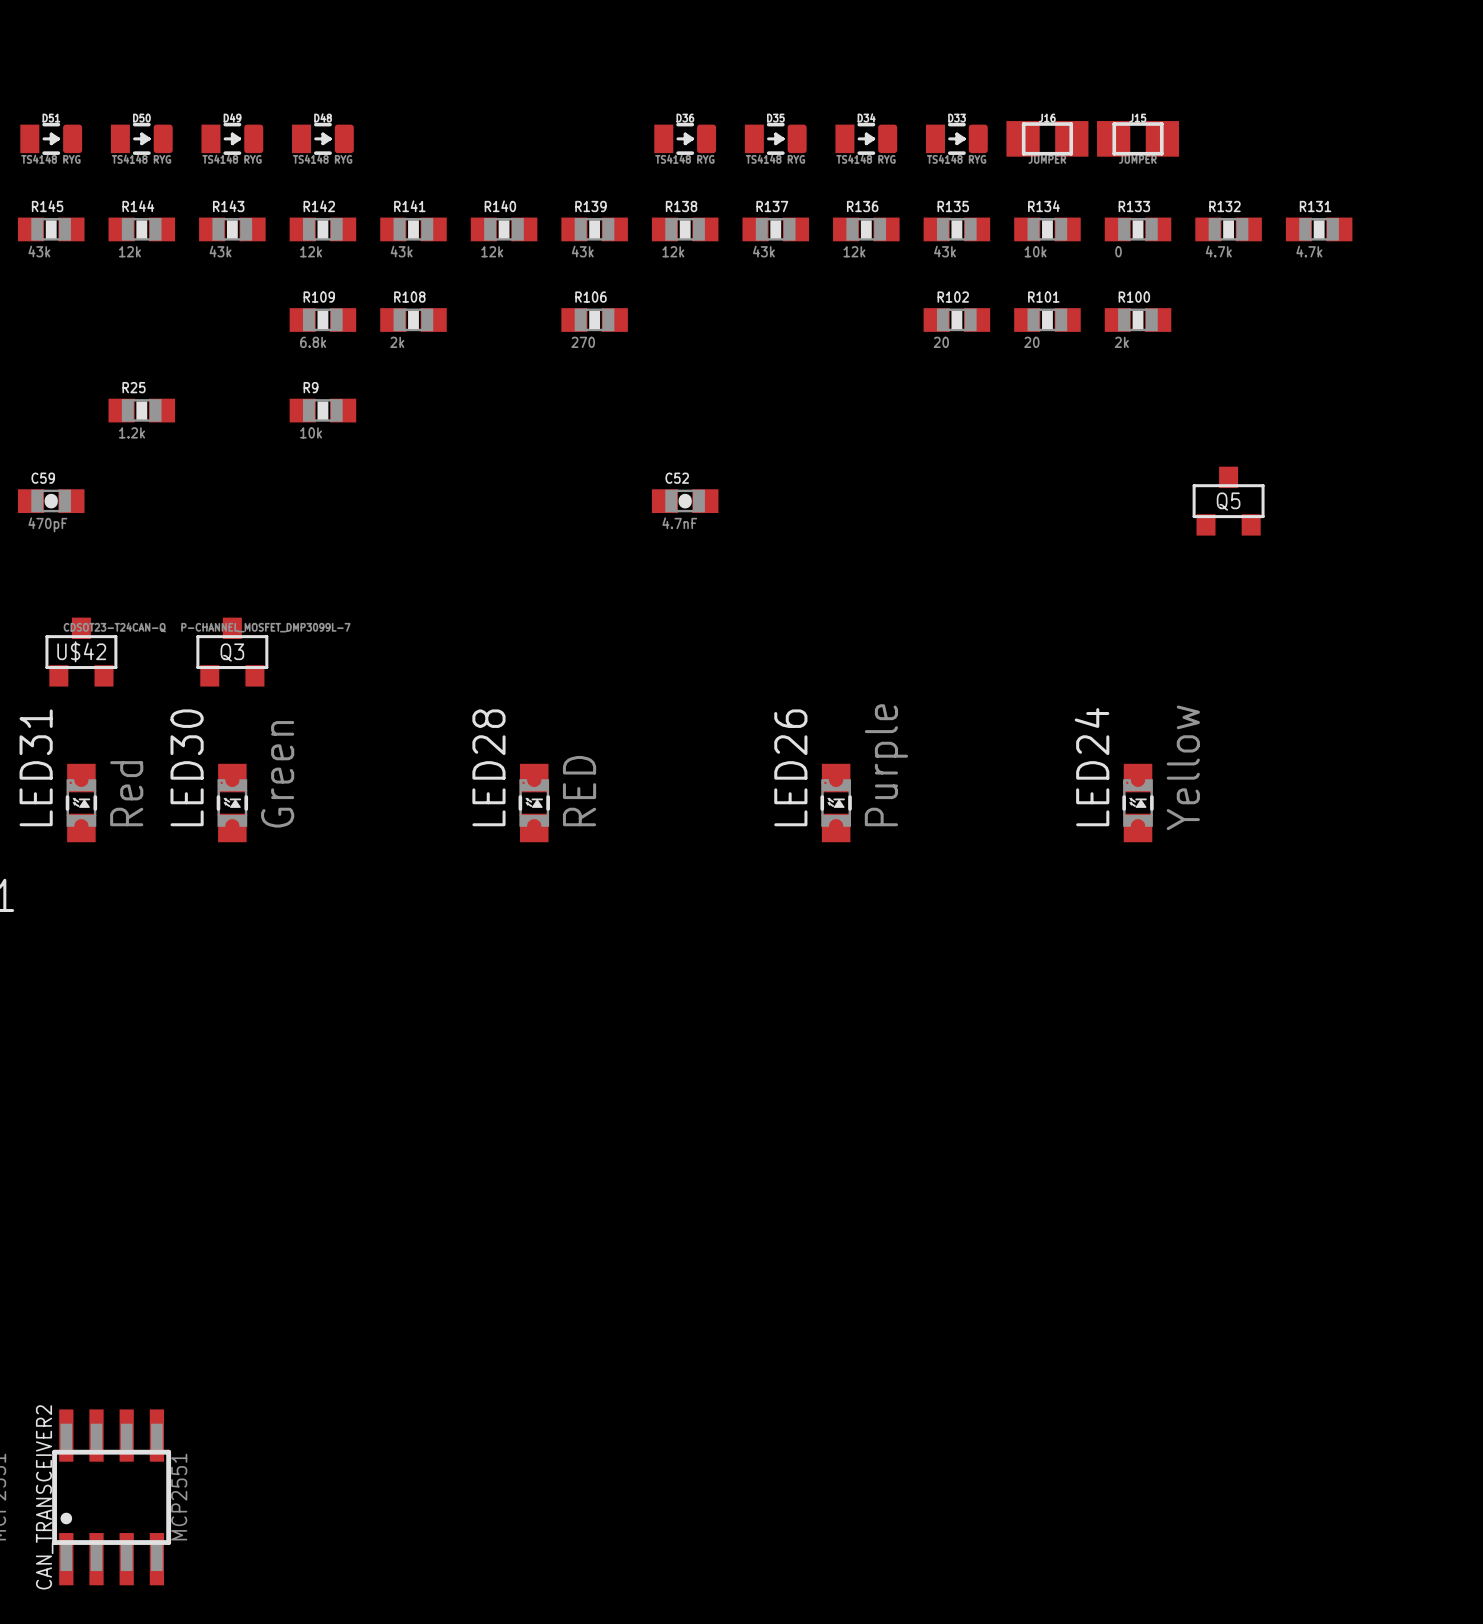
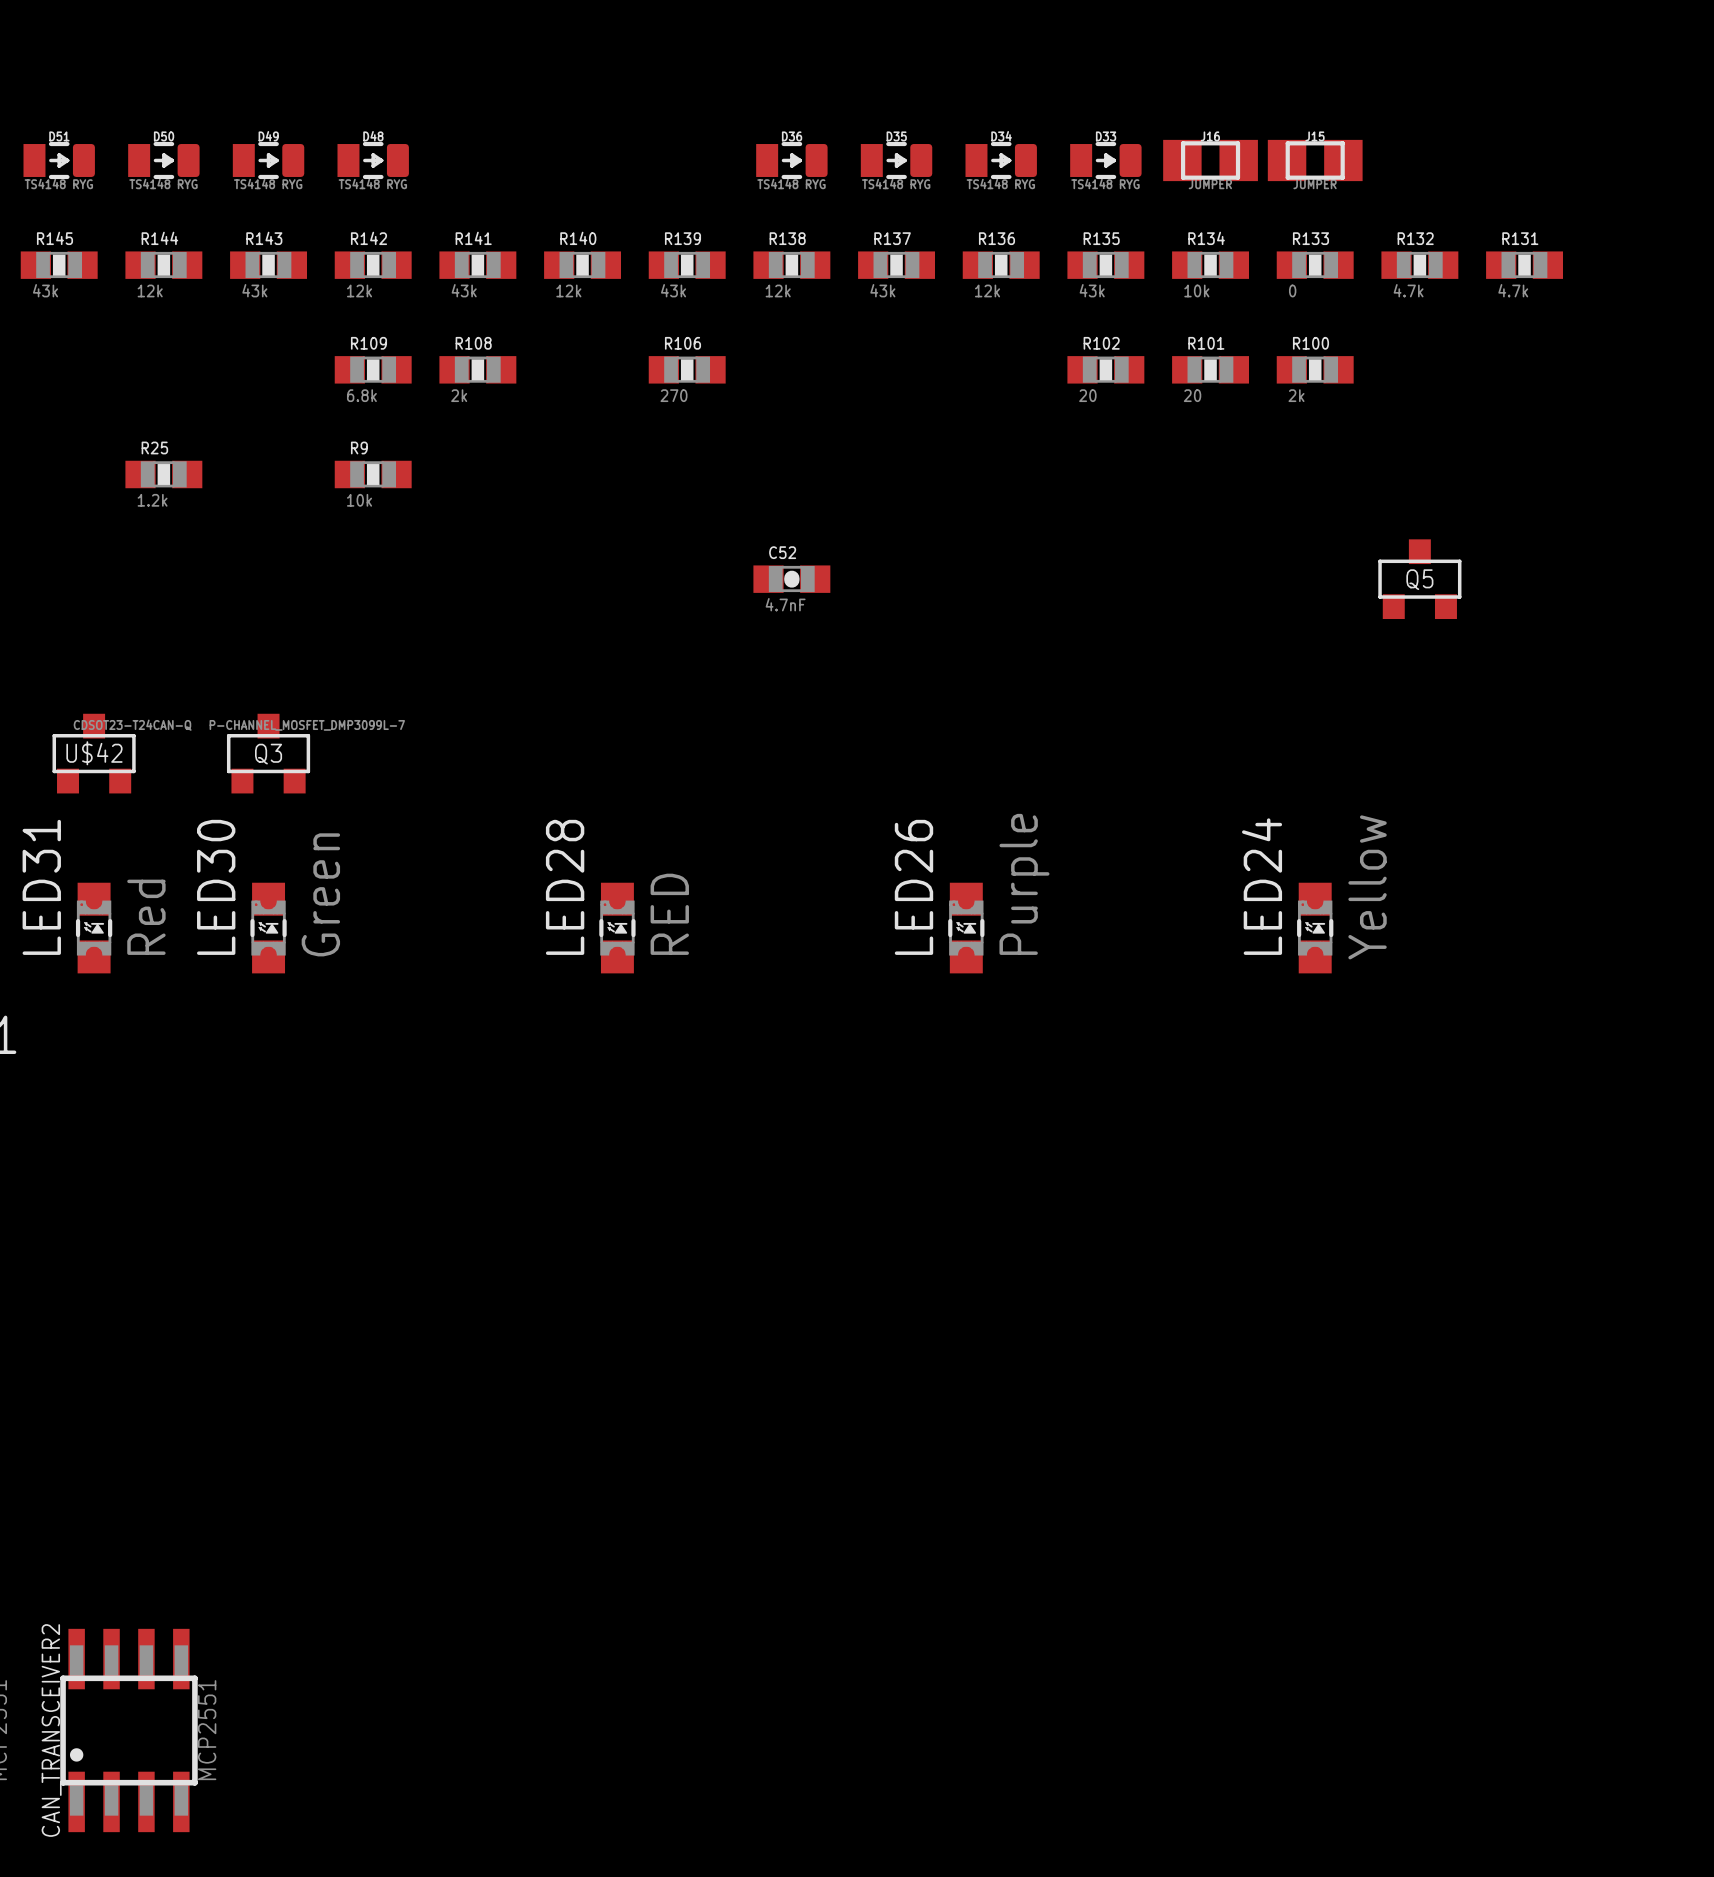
C59: 470pF (51, 501) -> none

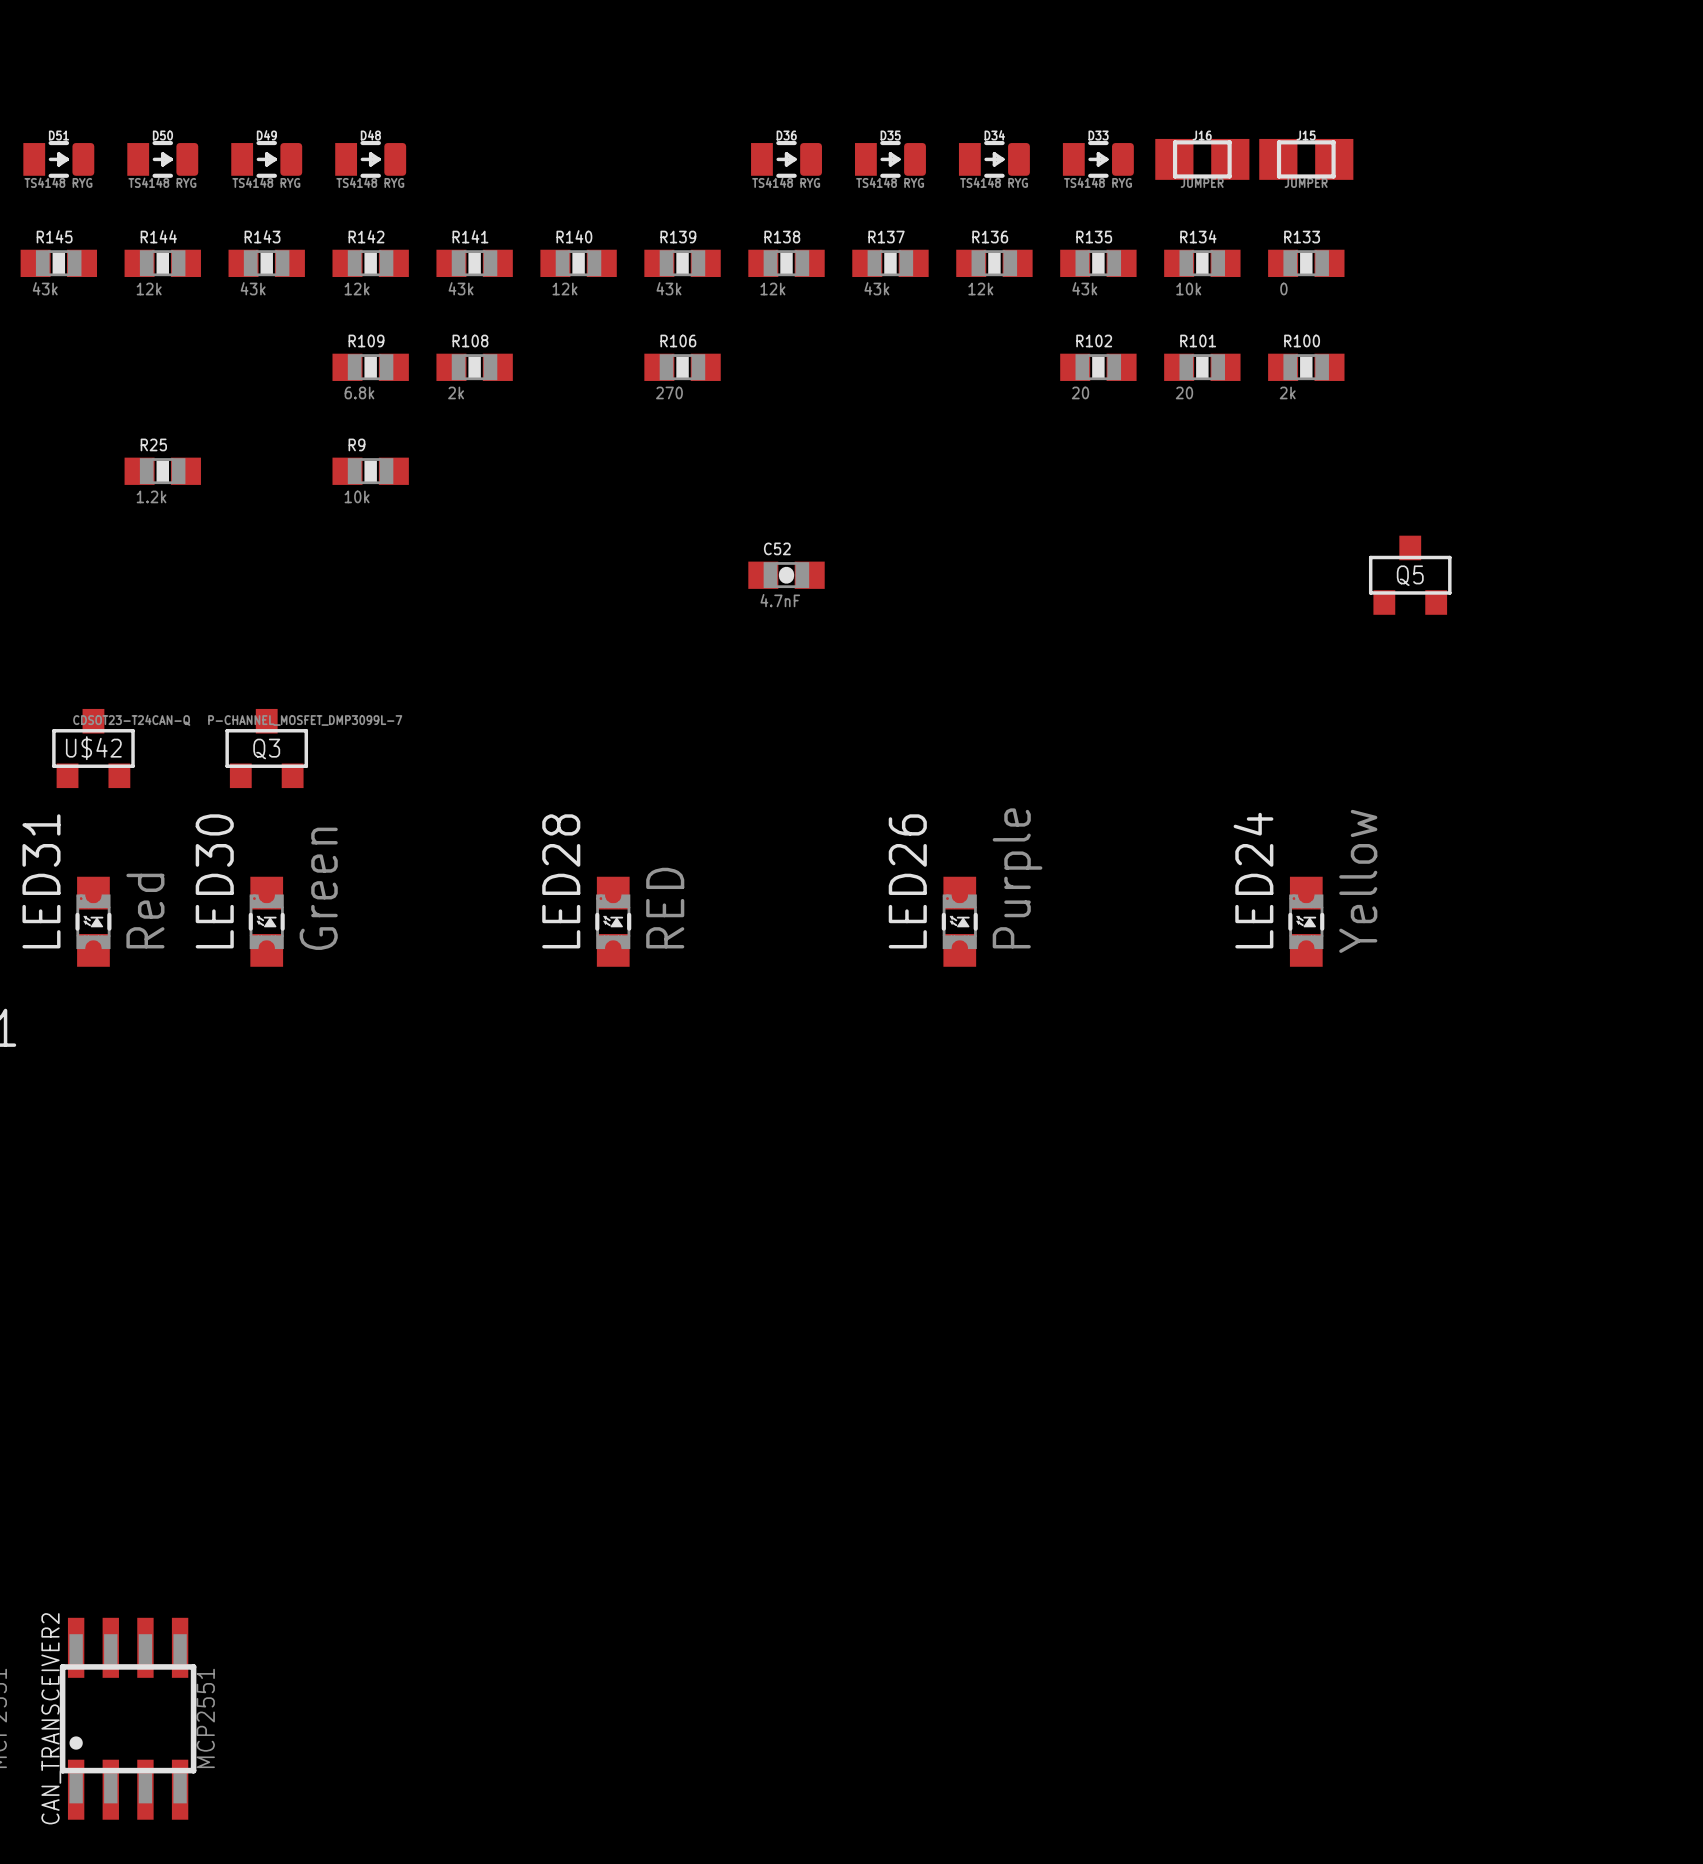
R132: 4.7k (1419, 265) -> none
R131: 4.7k (1524, 265) -> none

